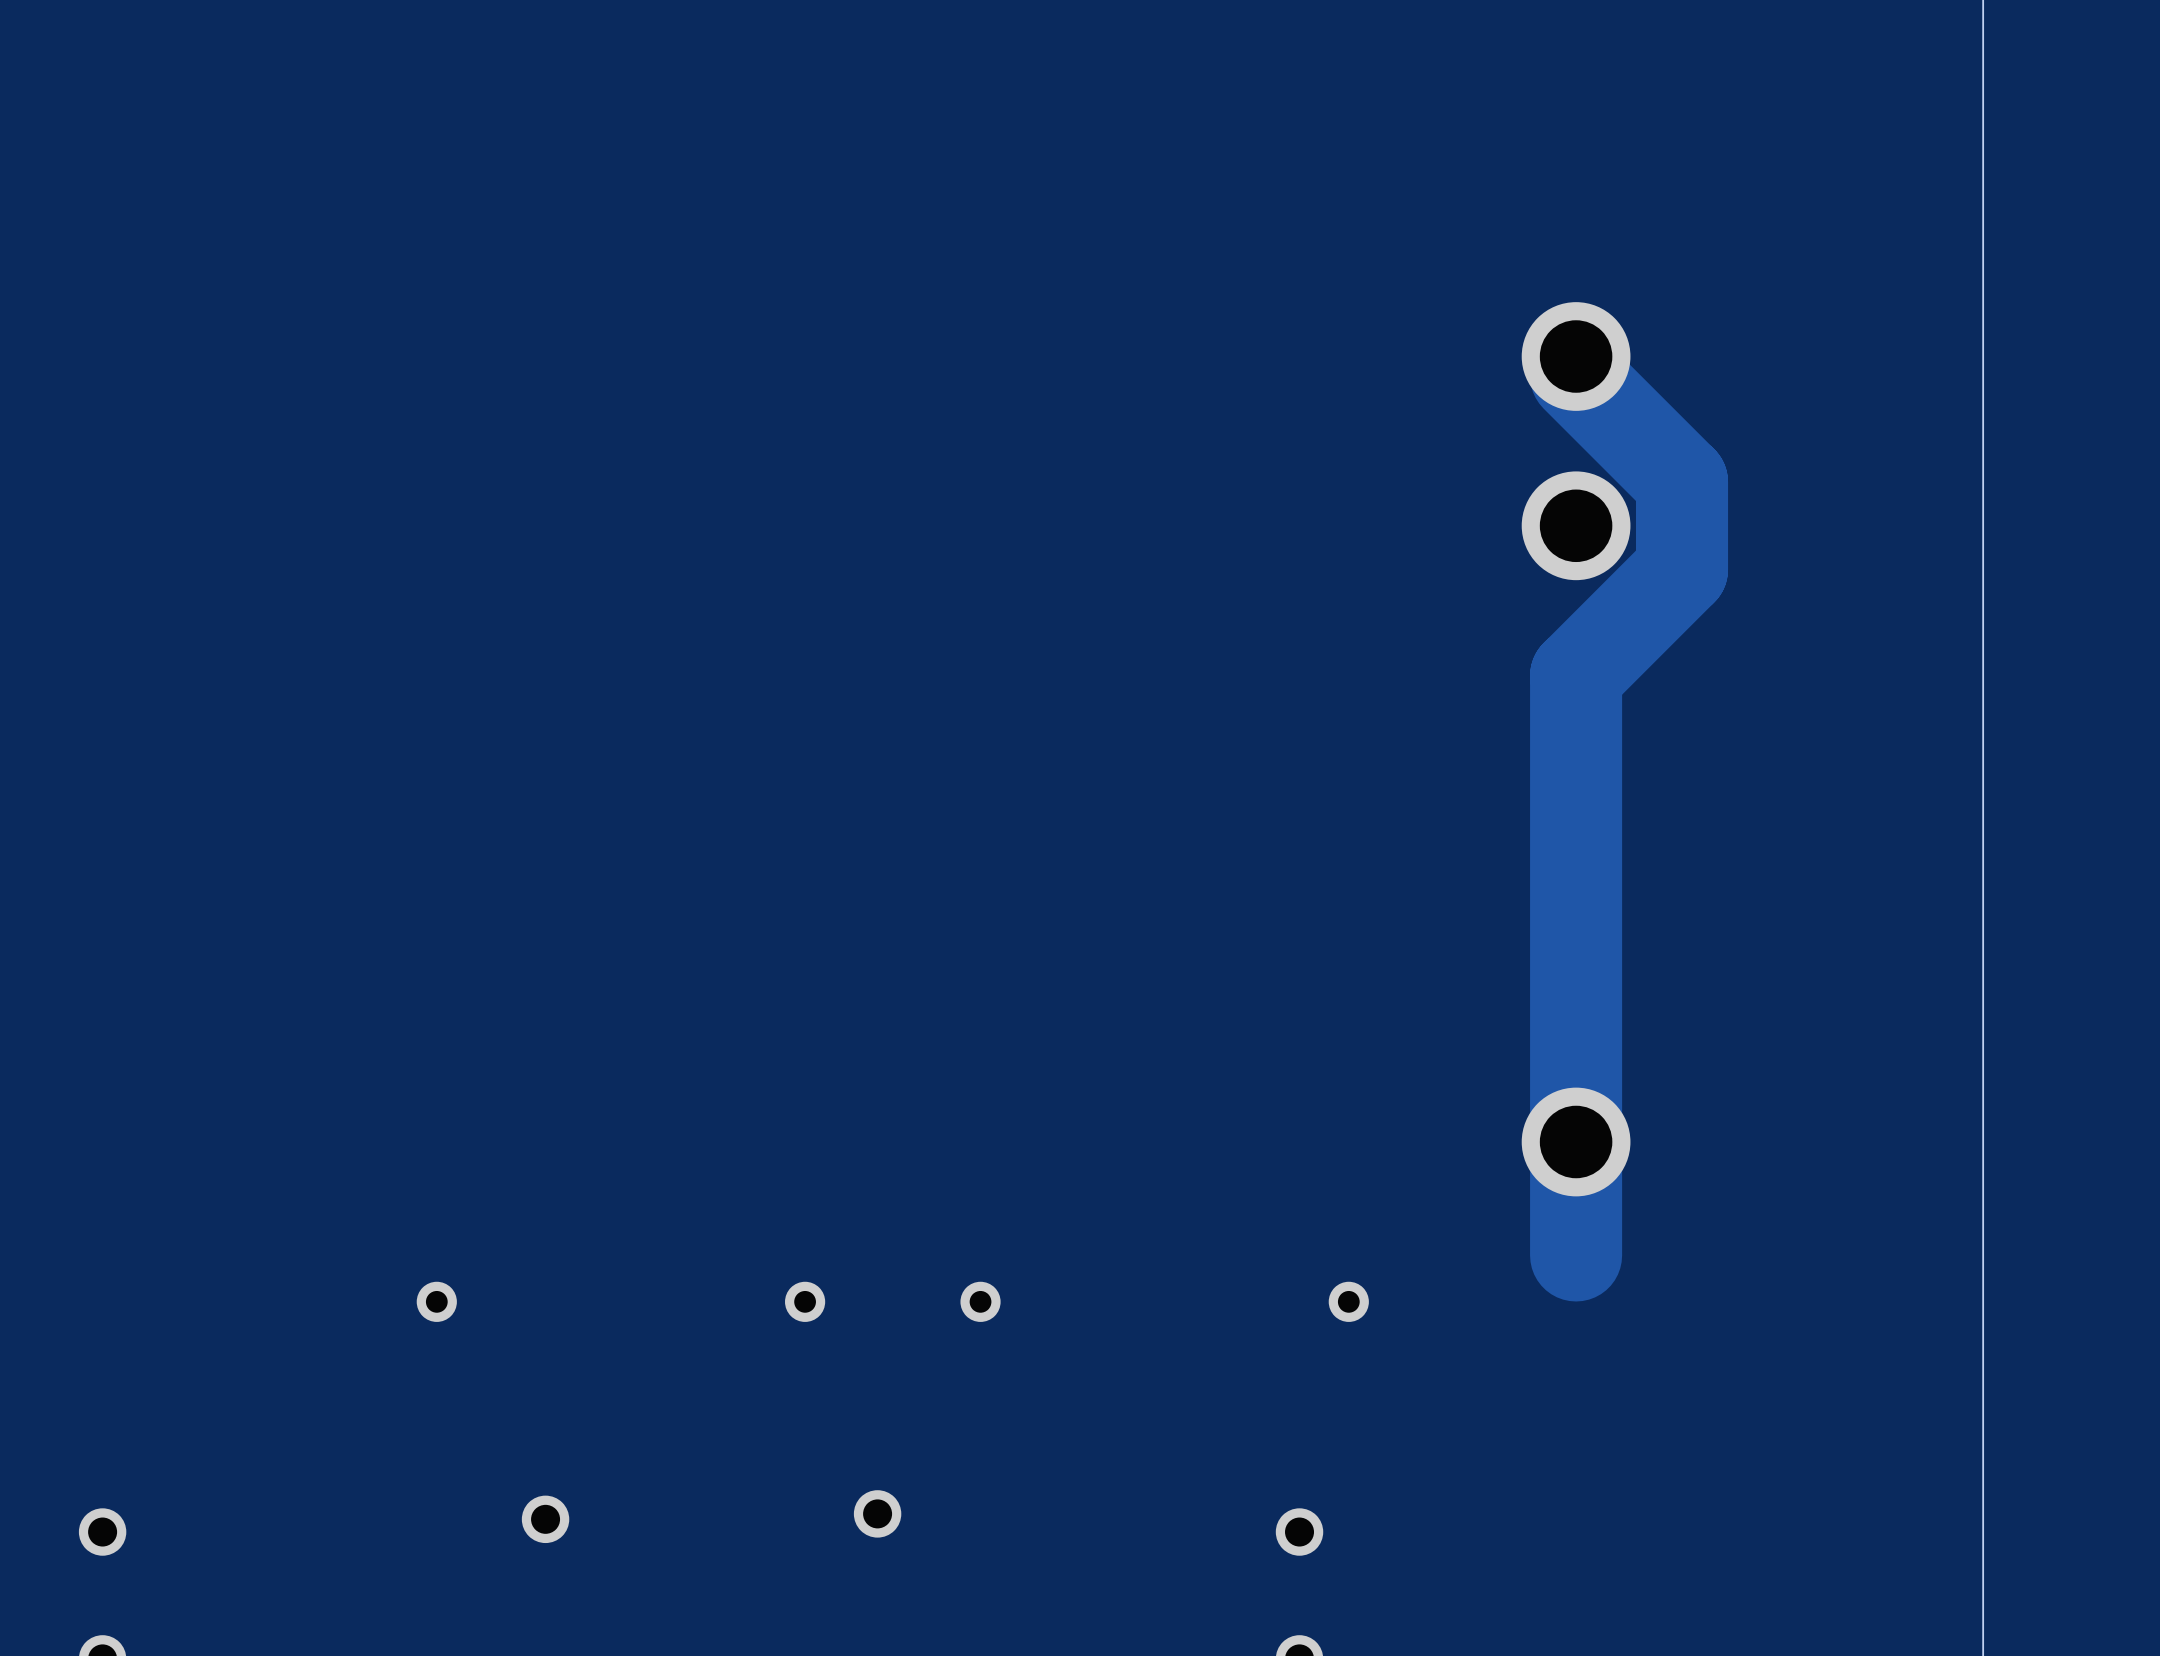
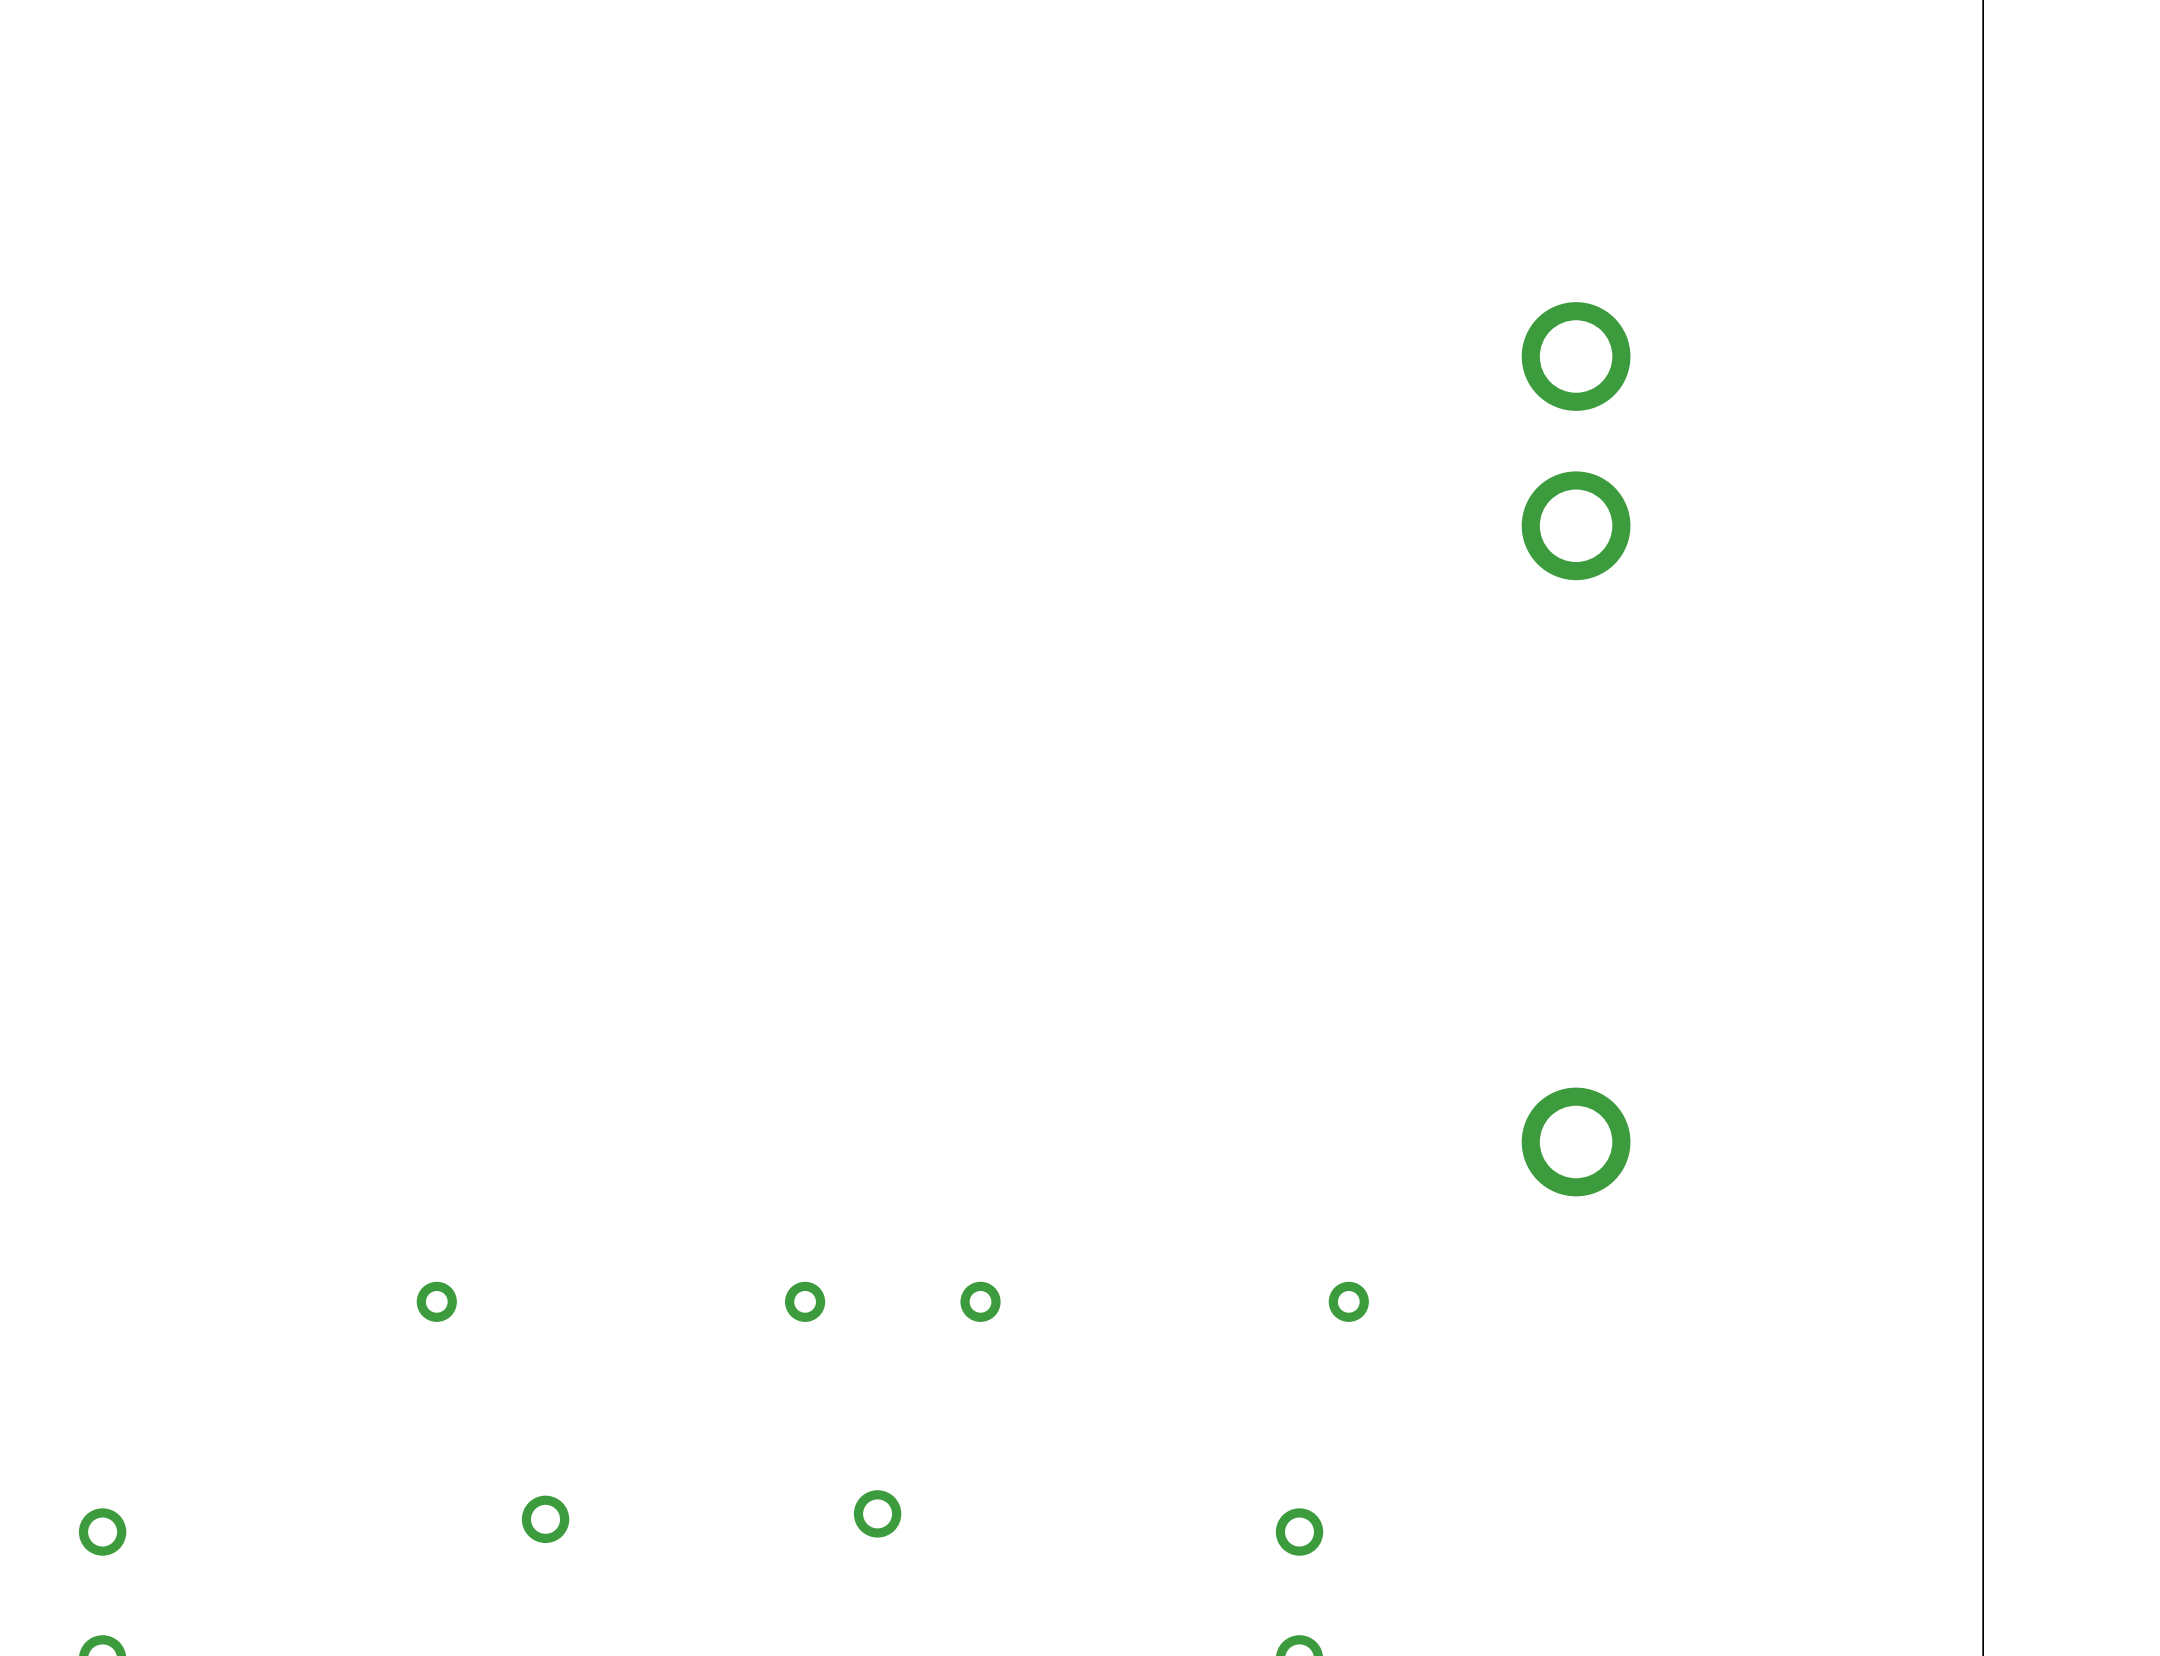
track: (1576, 375) (1682, 481) (1682, 569) (1576, 675) (1576, 1255) -> none

